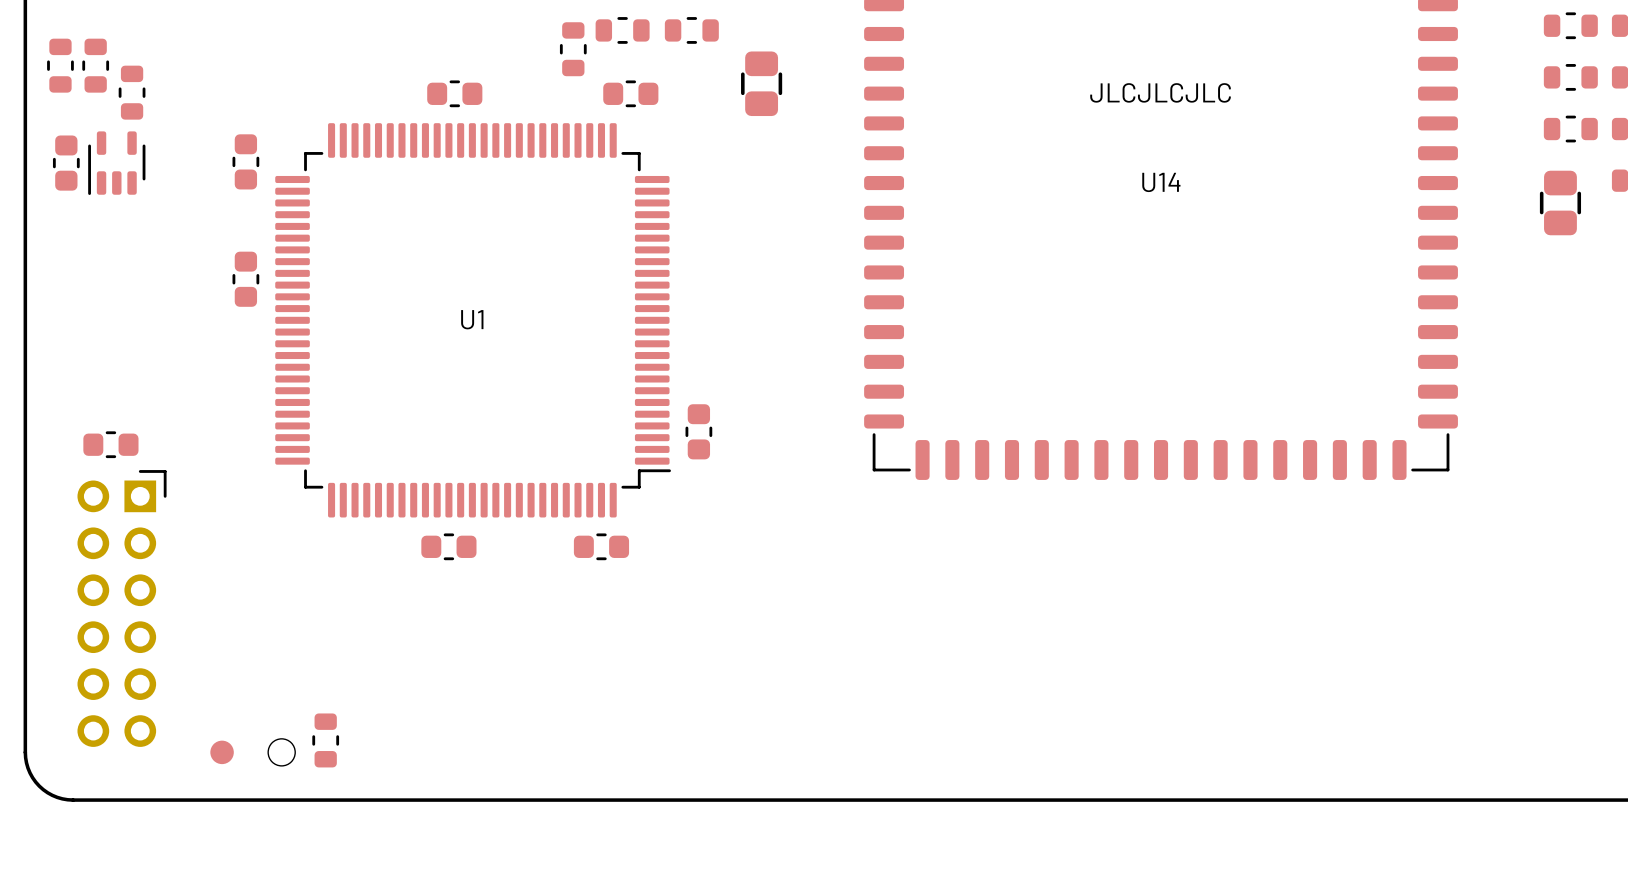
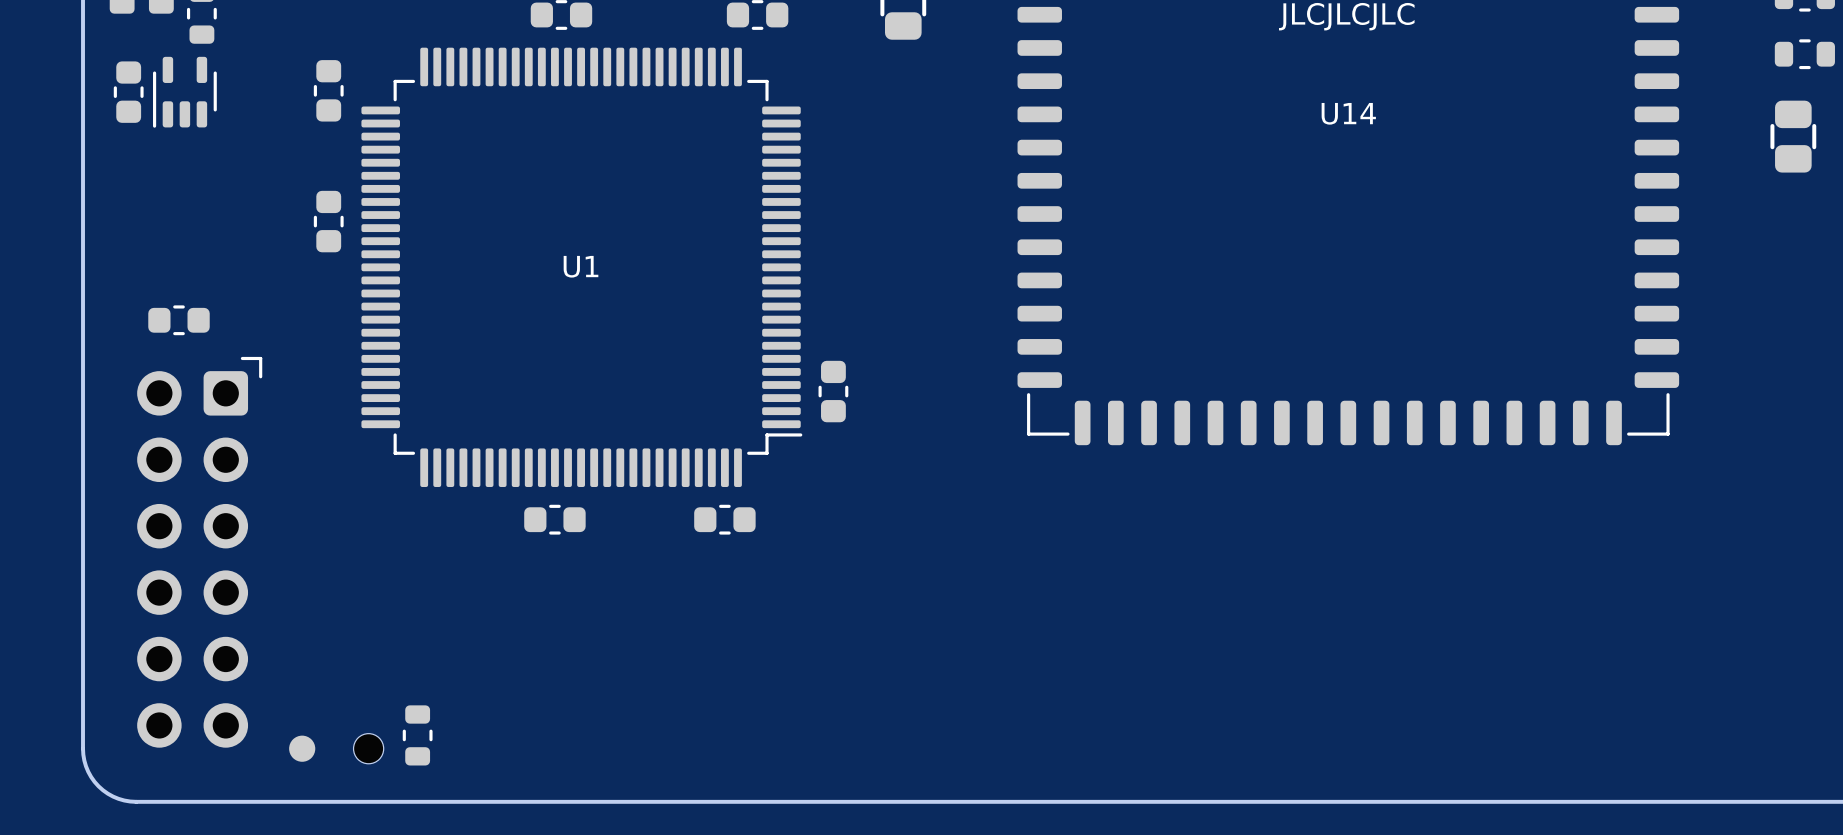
part position: (110, 444) -> (179, 320)
part: none -> (199, 552)
part: (122, 608) -> none

